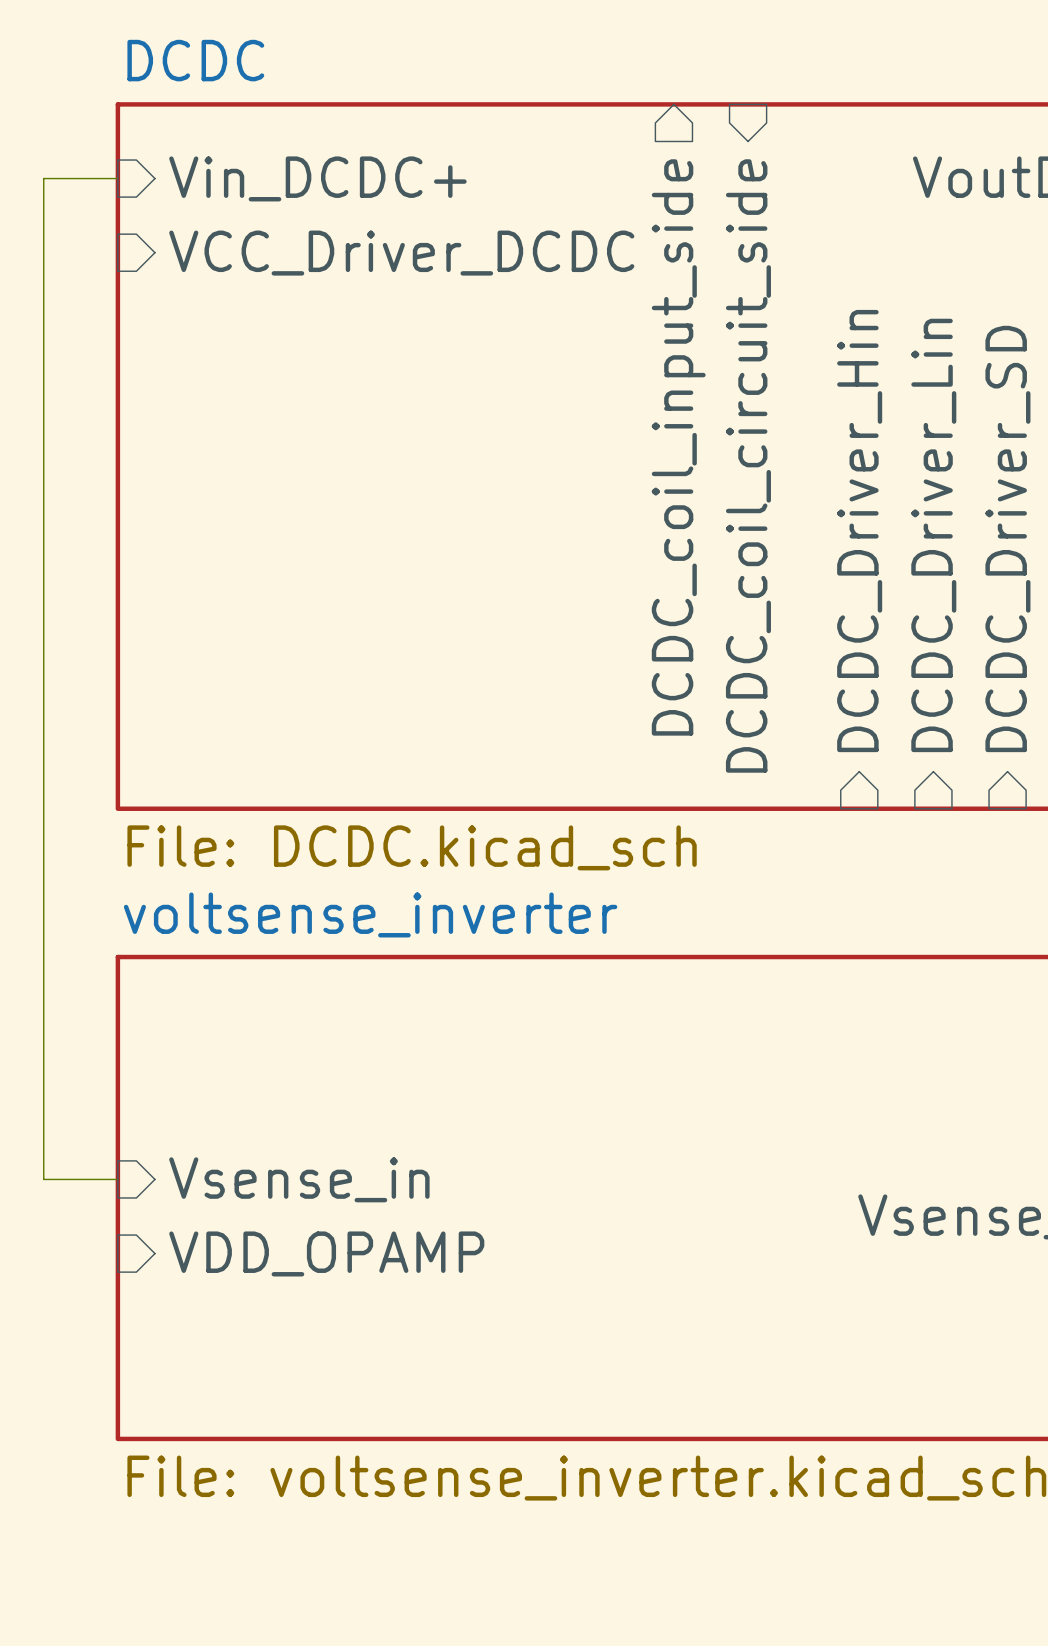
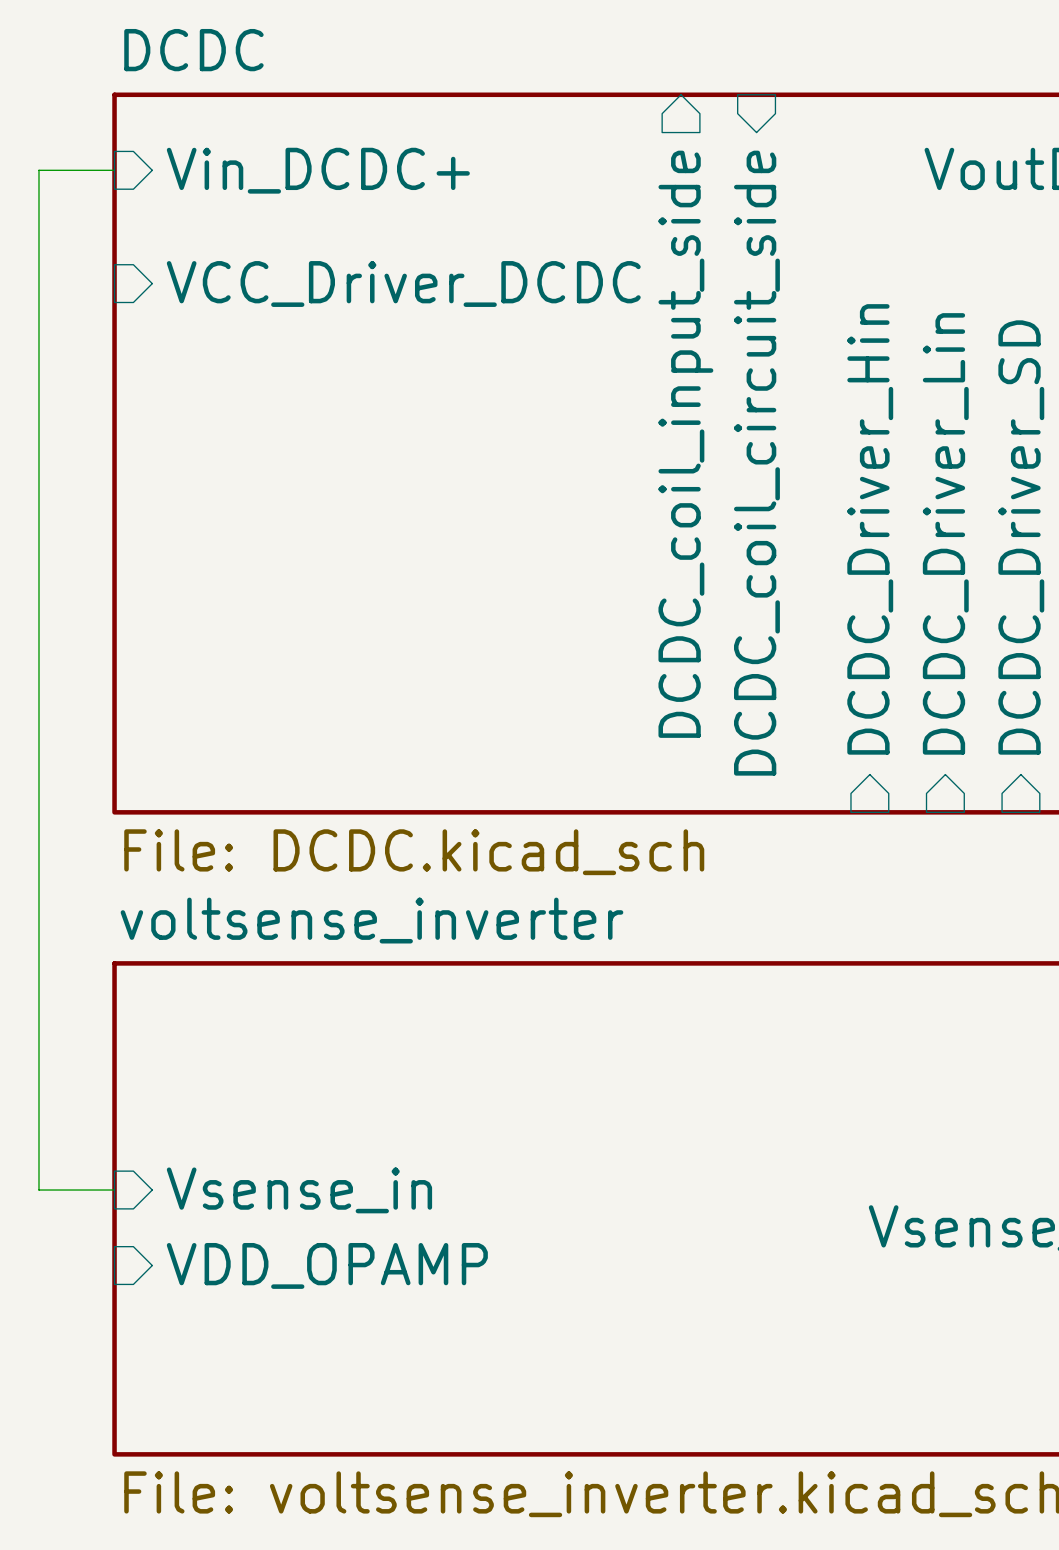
sheet pin position: VCC_Driver_DCDC (401, 253) -> VCC_Driver_DCDC (403, 284)

